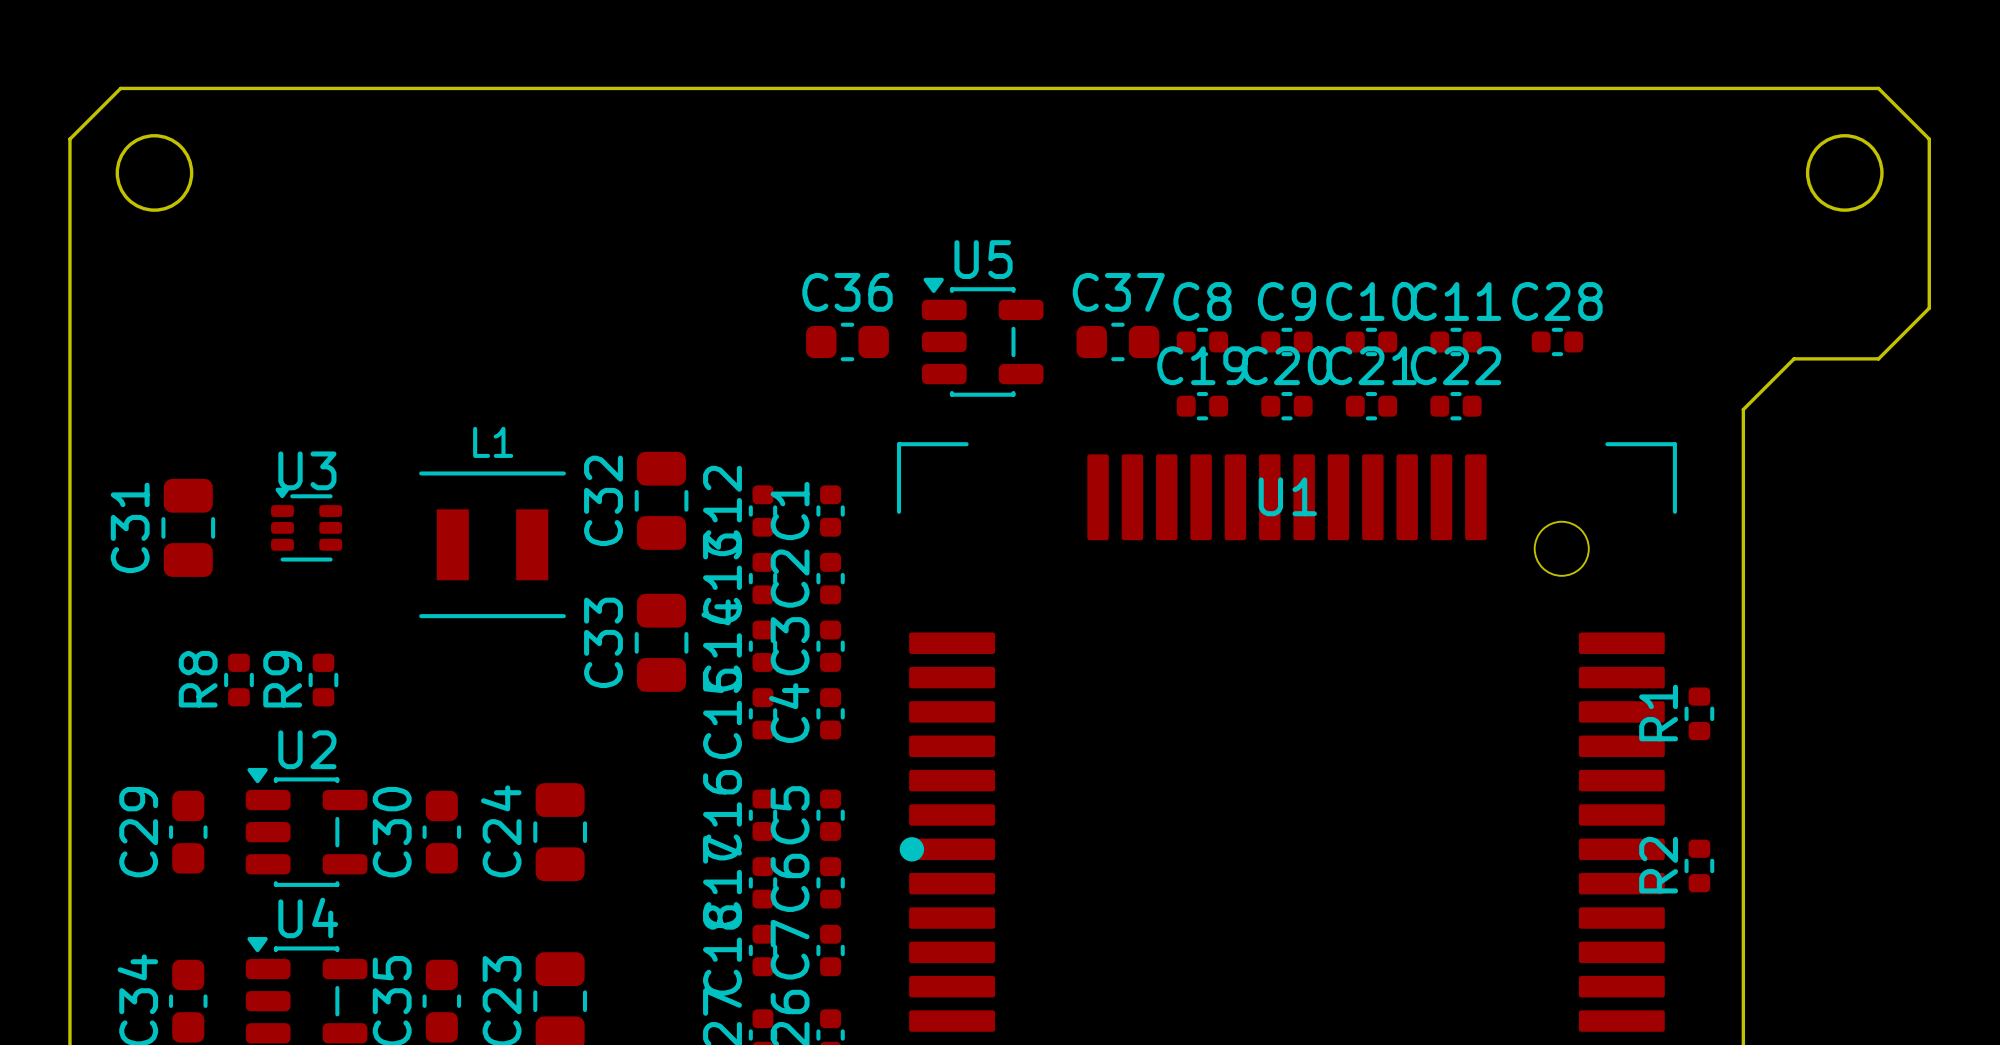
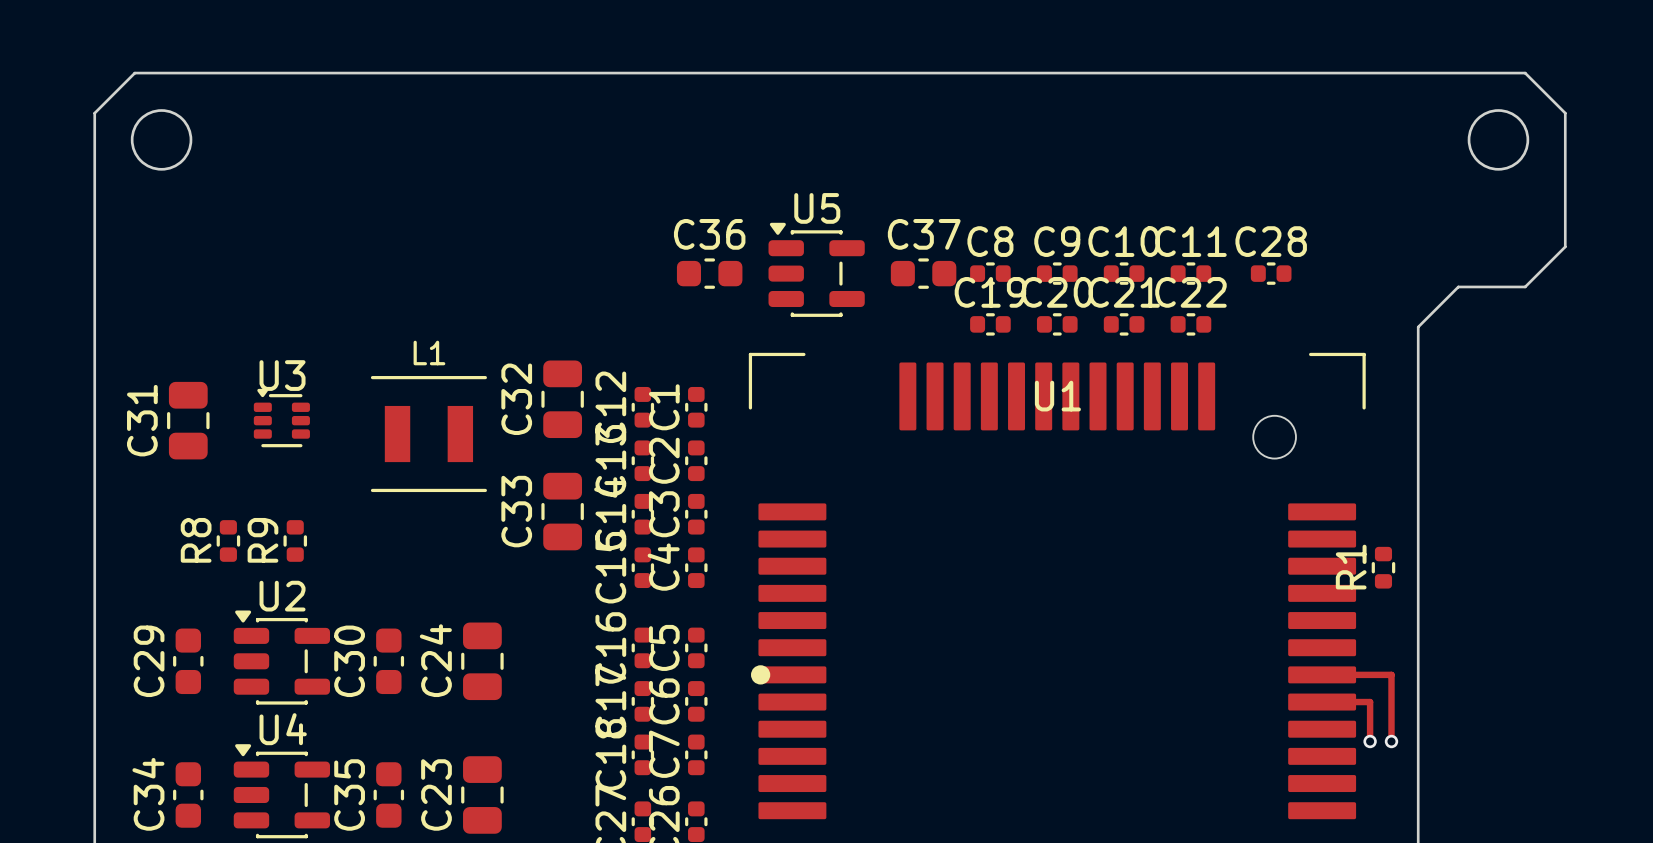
track: none -> (1338, 674) (1391, 674) (1391, 741)
R2: (1699, 865) -> none
track: none -> (1338, 702) (1370, 702) (1370, 741)
via: none -> (1370, 741)
via: none -> (1391, 741)

